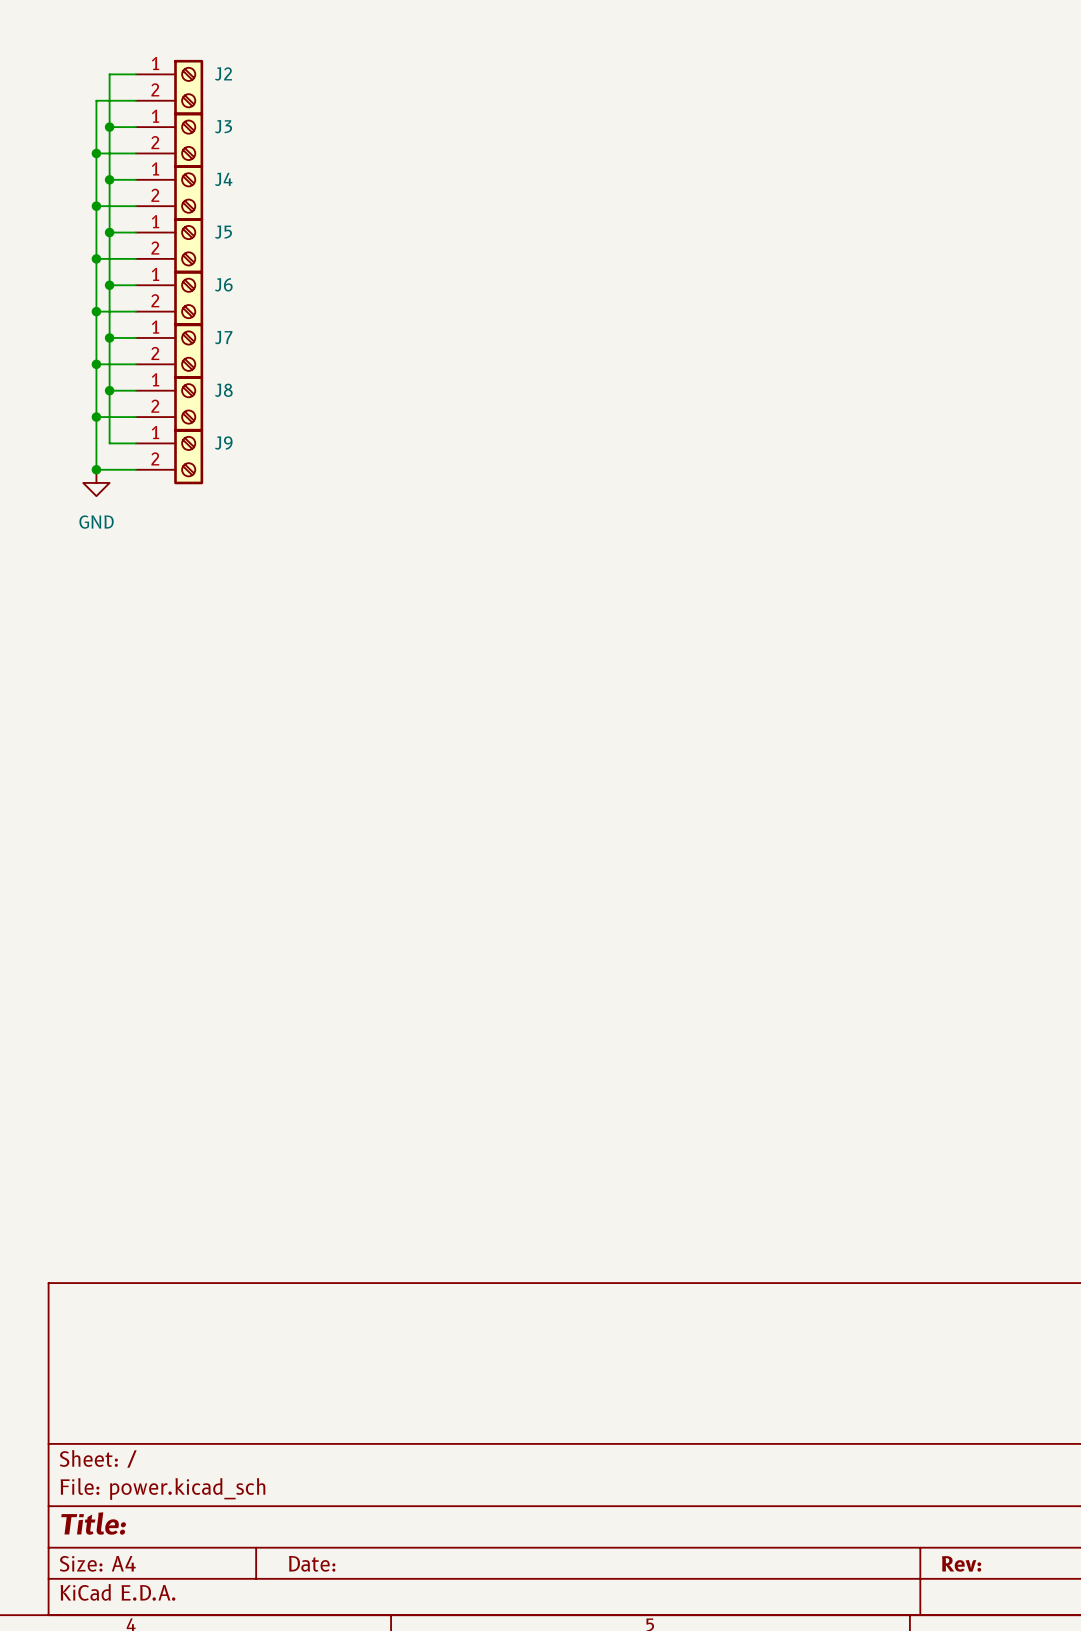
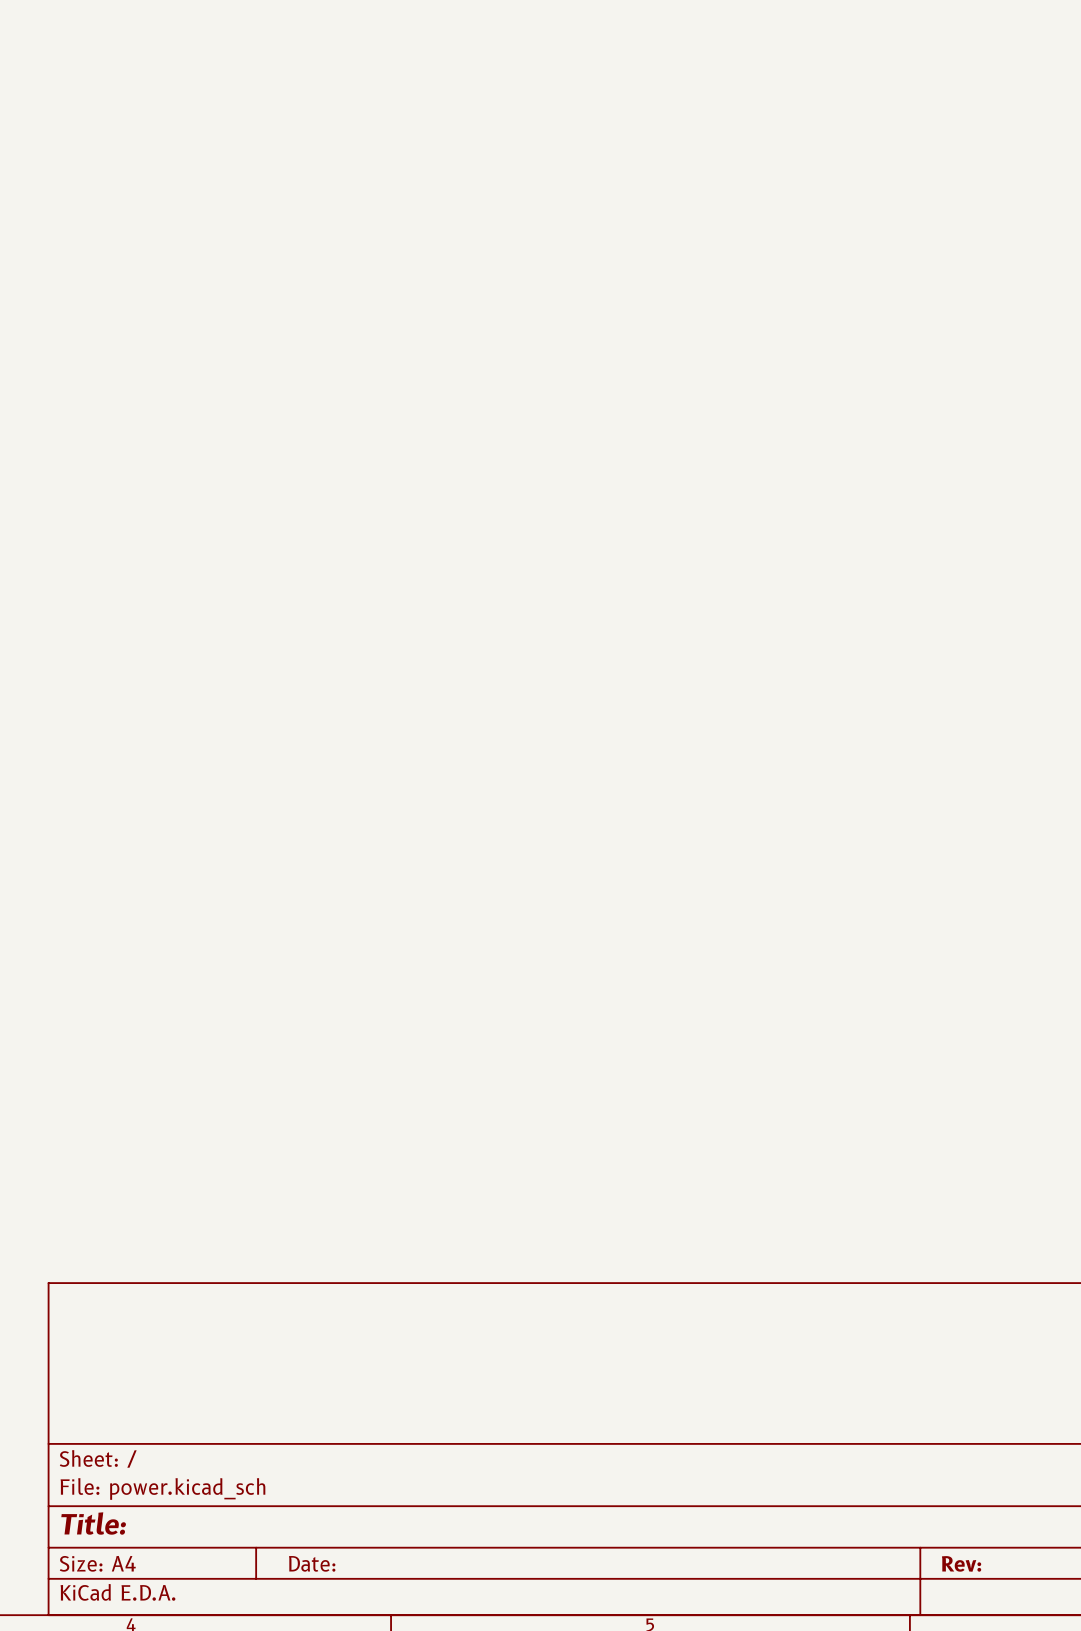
wire: (135, 74) (109, 74) (109, 443) (135, 443) -> none
J2: (169, 87) -> none
wire: (135, 100) (96, 100) (96, 469) (135, 469) -> none
wire: (109, 127) (135, 127) -> none
junction: (109, 127) -> none
J3: (169, 140) -> none
wire: (96, 153) (135, 153) -> none
junction: (96, 153) -> none
wire: (109, 179) (135, 179) -> none
junction: (109, 179) -> none
J4: (169, 193) -> none
wire: (96, 206) (135, 206) -> none
junction: (96, 206) -> none
wire: (109, 232) (135, 232) -> none
junction: (109, 232) -> none
J5: (169, 245) -> none
wire: (96, 258) (135, 258) -> none
junction: (96, 258) -> none
wire: (109, 285) (135, 285) -> none
junction: (109, 285) -> none
J6: (169, 298) -> none
wire: (96, 311) (135, 311) -> none
junction: (96, 311) -> none
wire: (109, 337) (135, 337) -> none
junction: (109, 337) -> none
J7: (169, 351) -> none
wire: (96, 364) (135, 364) -> none
junction: (96, 364) -> none
wire: (109, 390) (135, 390) -> none
junction: (109, 390) -> none
J8: (169, 403) -> none
wire: (96, 417) (135, 417) -> none
junction: (96, 417) -> none
J9: (169, 456) -> none
junction: (96, 469) -> none
power symbol: GND (96, 482) -> none

